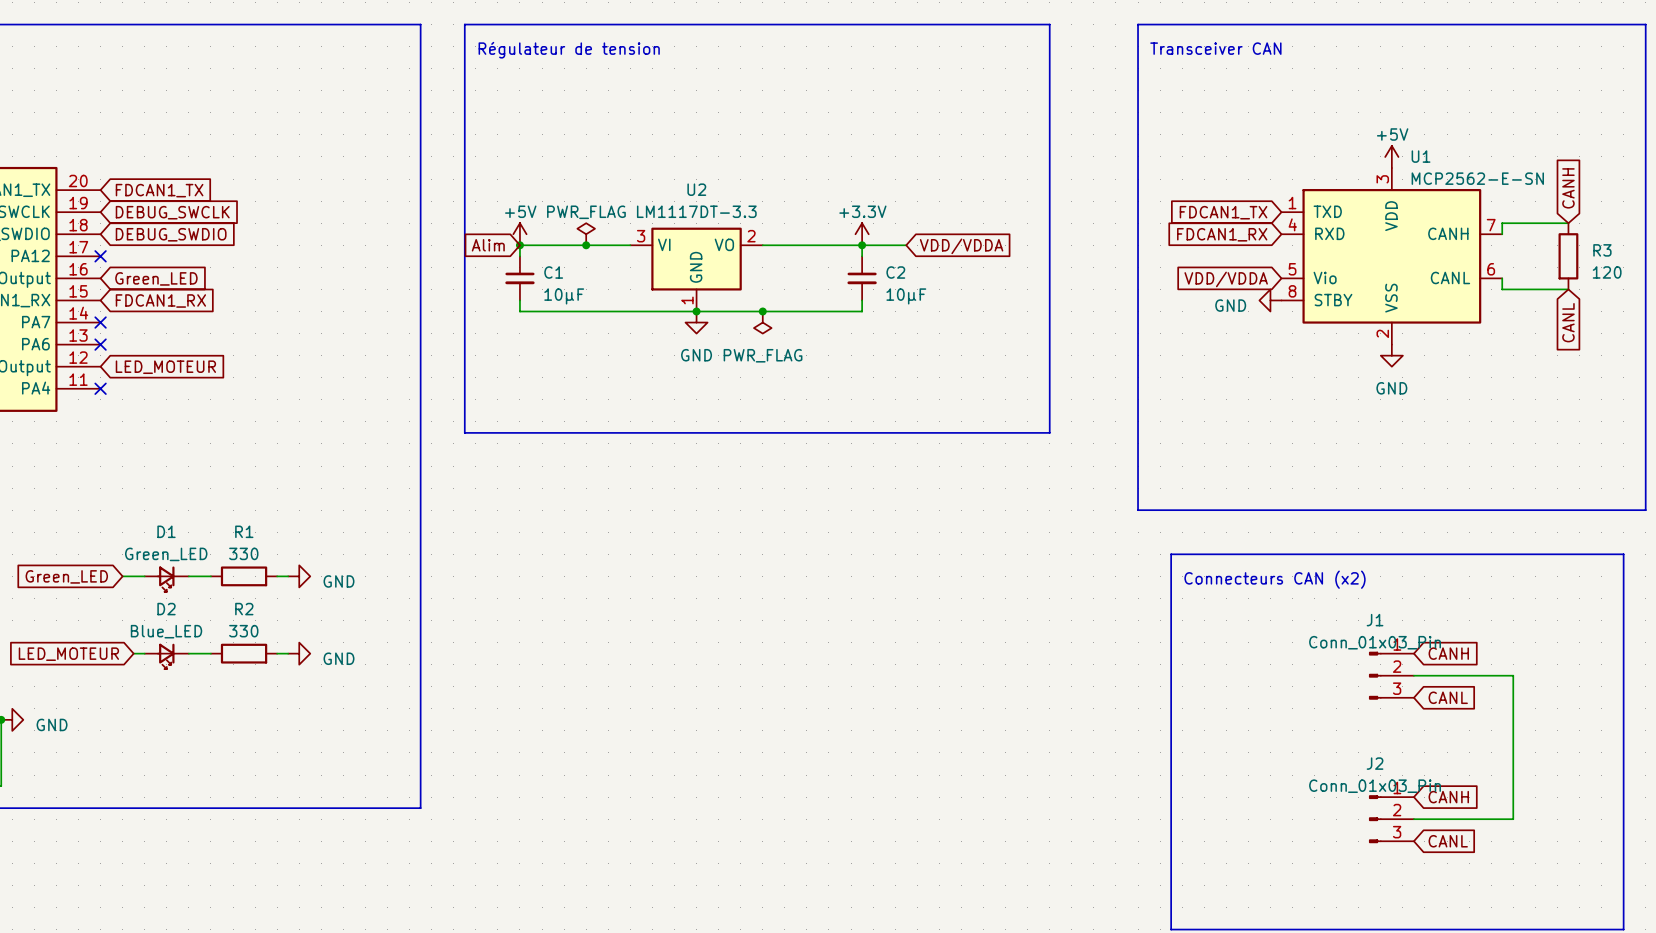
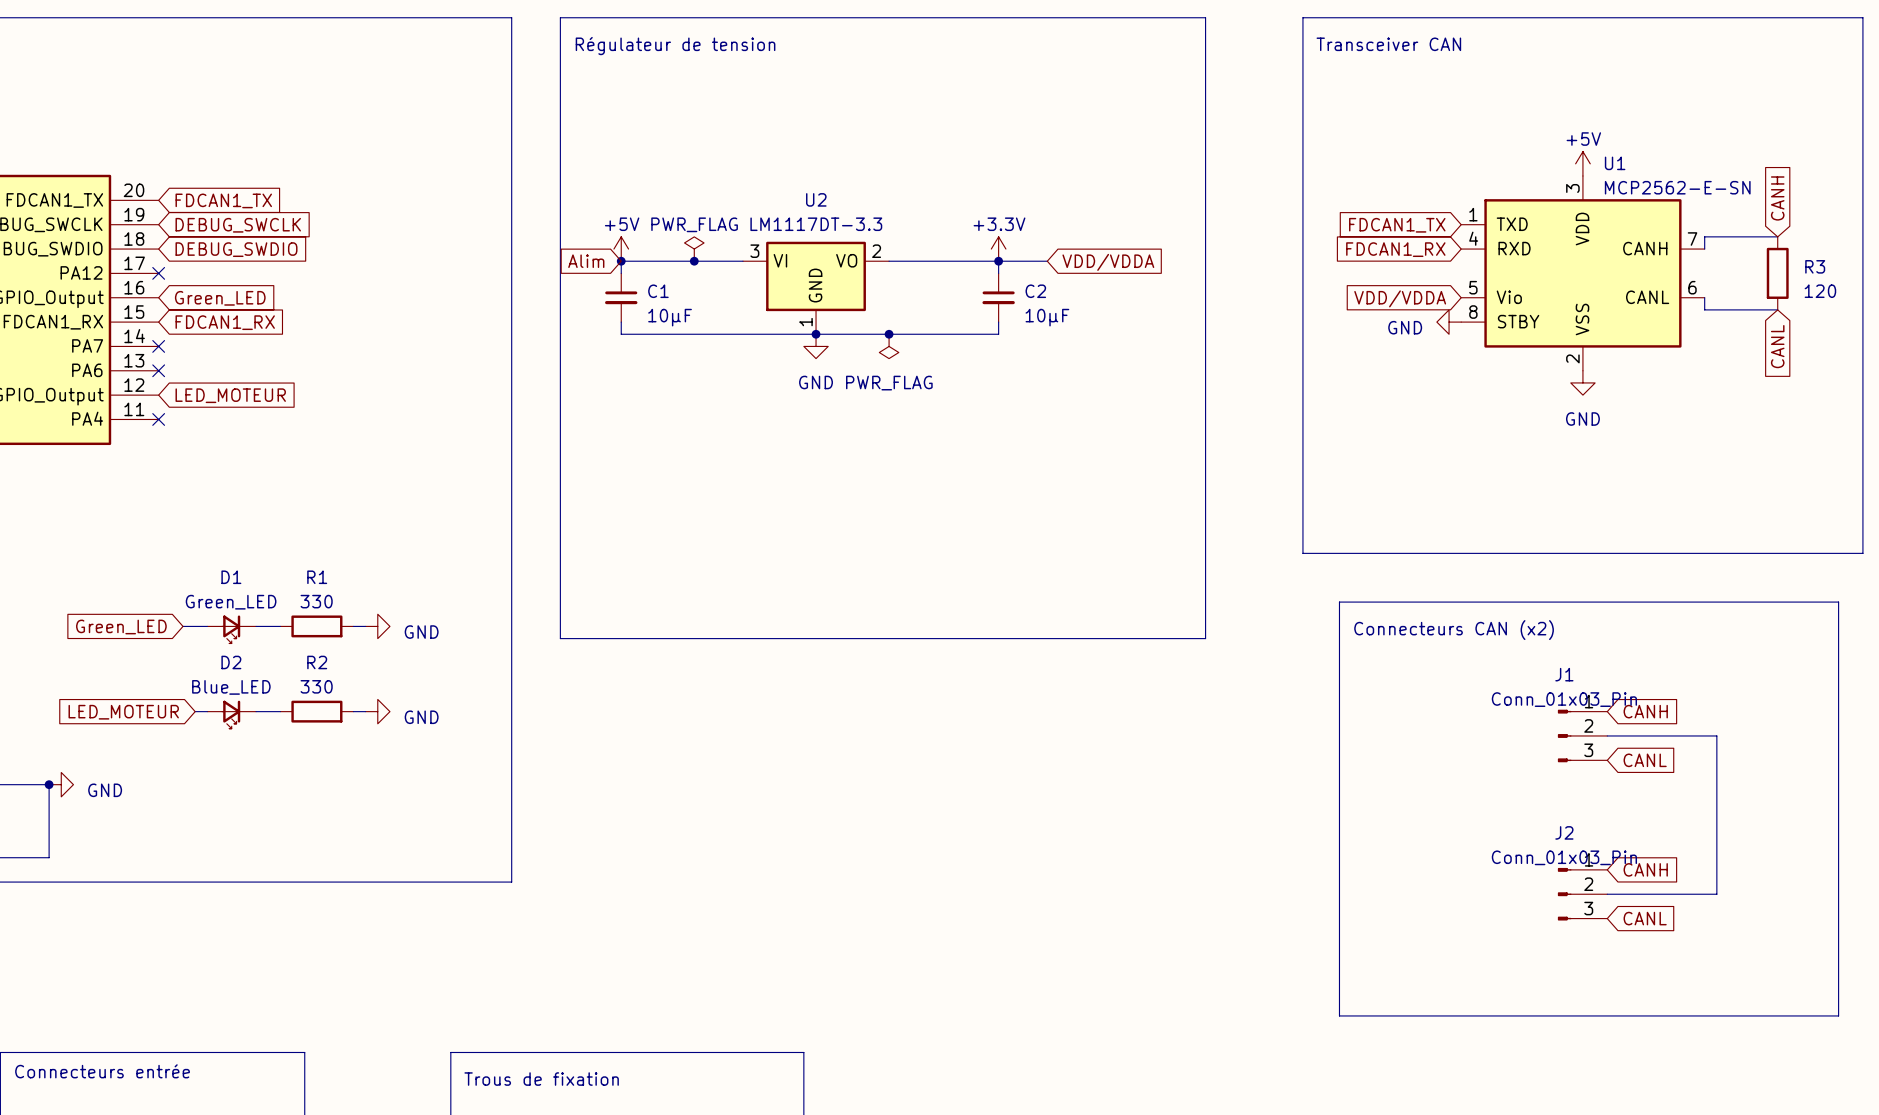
line: (464, 432) (1049, 432) -> (560, 468) (560, 638) (1205, 638) (1205, 468)

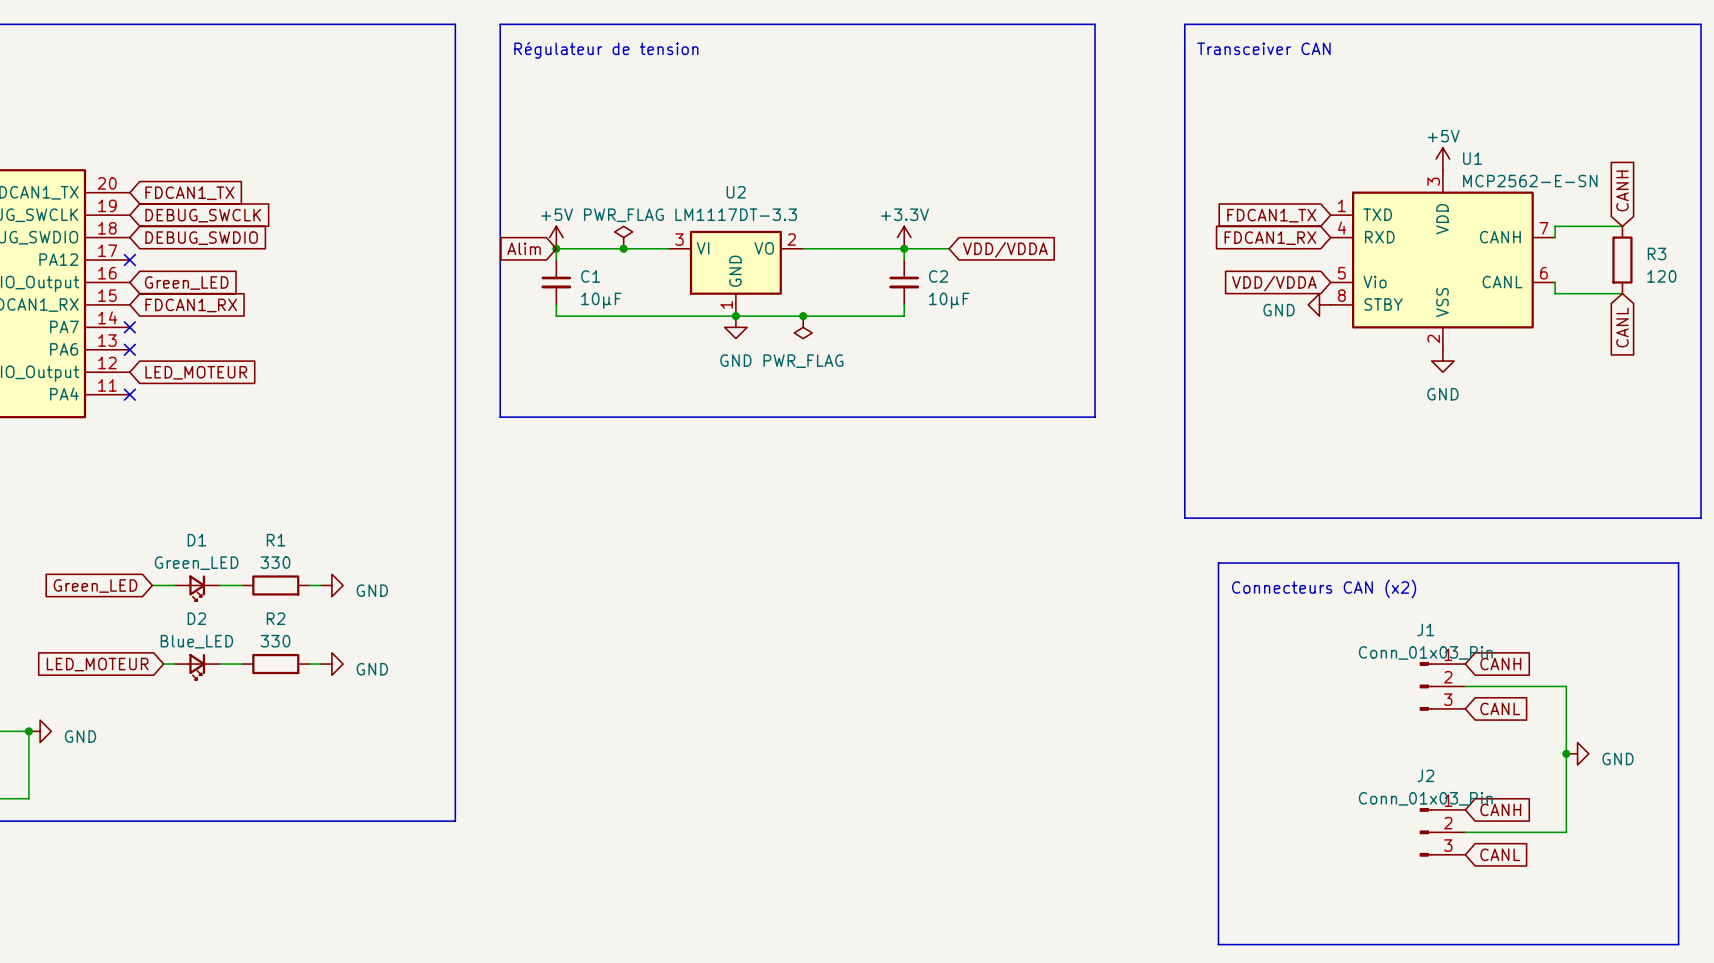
line: (560, 443) (560, 638) (1205, 638) (1205, 443) -> (500, 417) (1095, 417)
junction: none -> (1566, 753)
power symbol: none -> GND (1577, 753)

